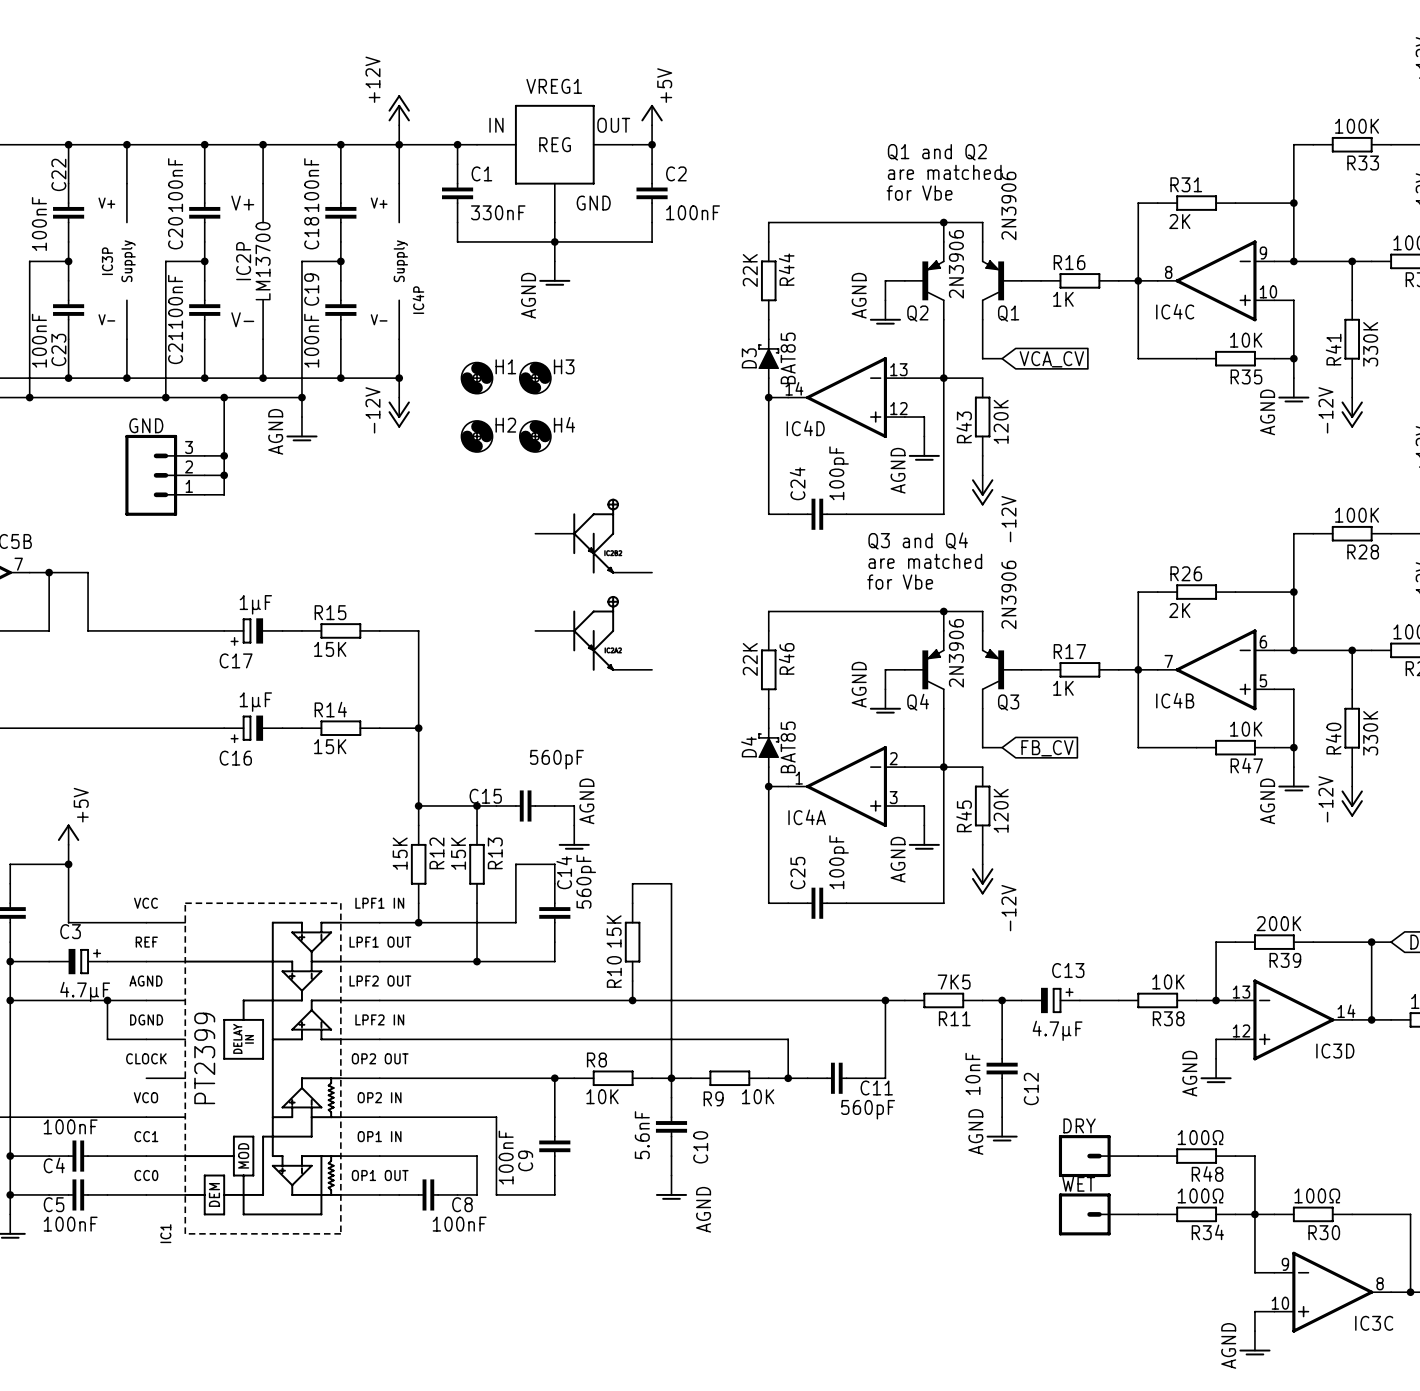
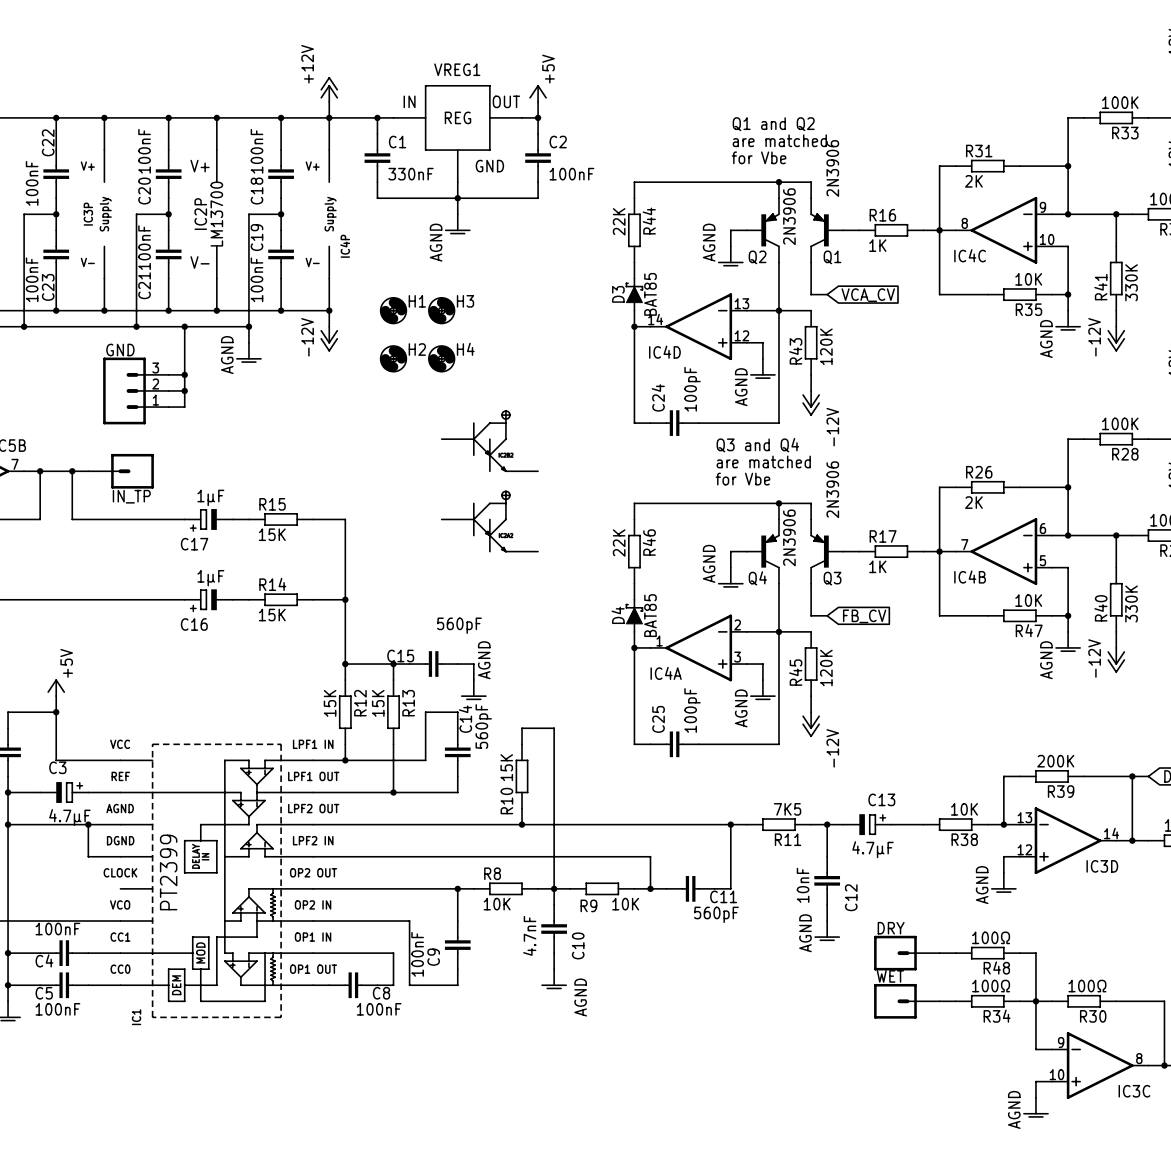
wire: none -> (72, 471) (88, 471)
junction: none -> (72, 471)
IN_TP: none -> (121, 471)
C10 value: 5.6nF (642, 1135) -> 4.7nF (529, 935)

